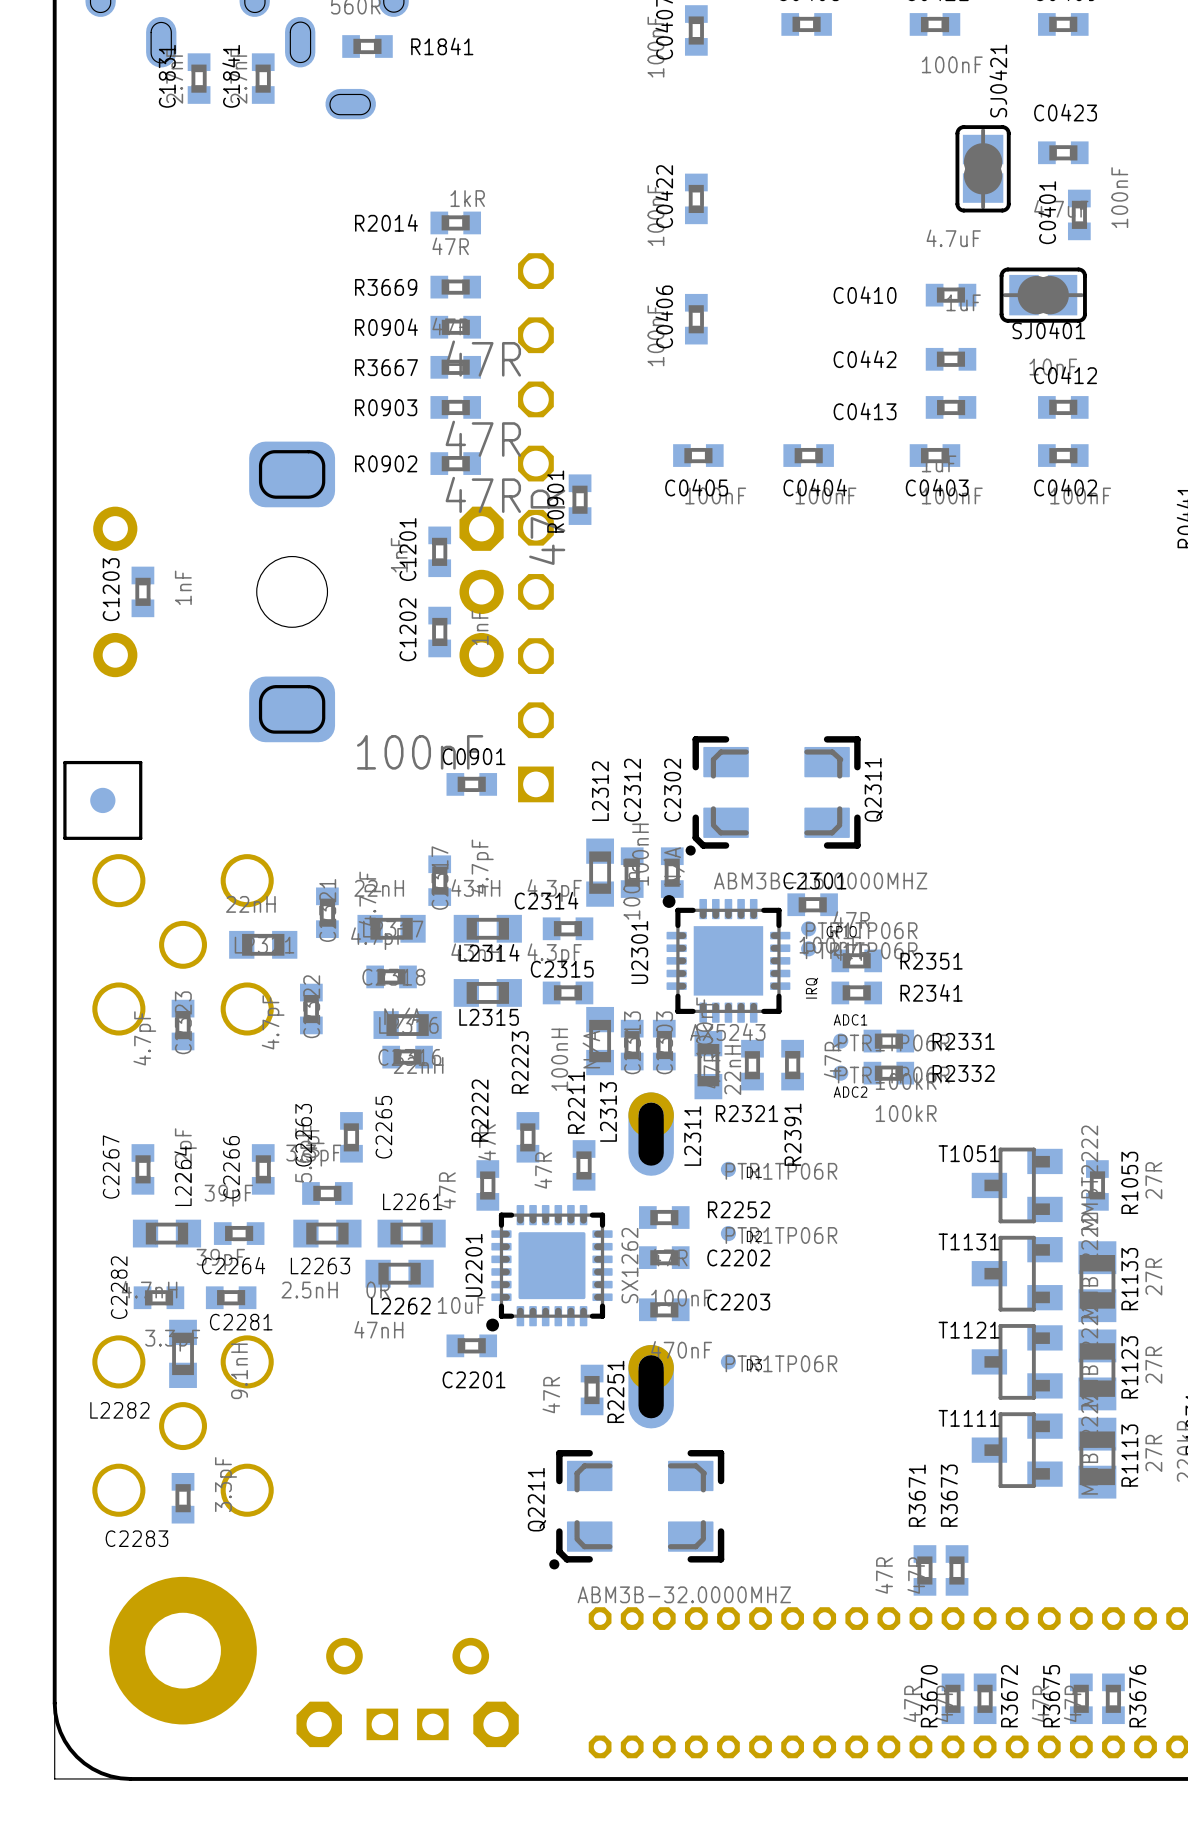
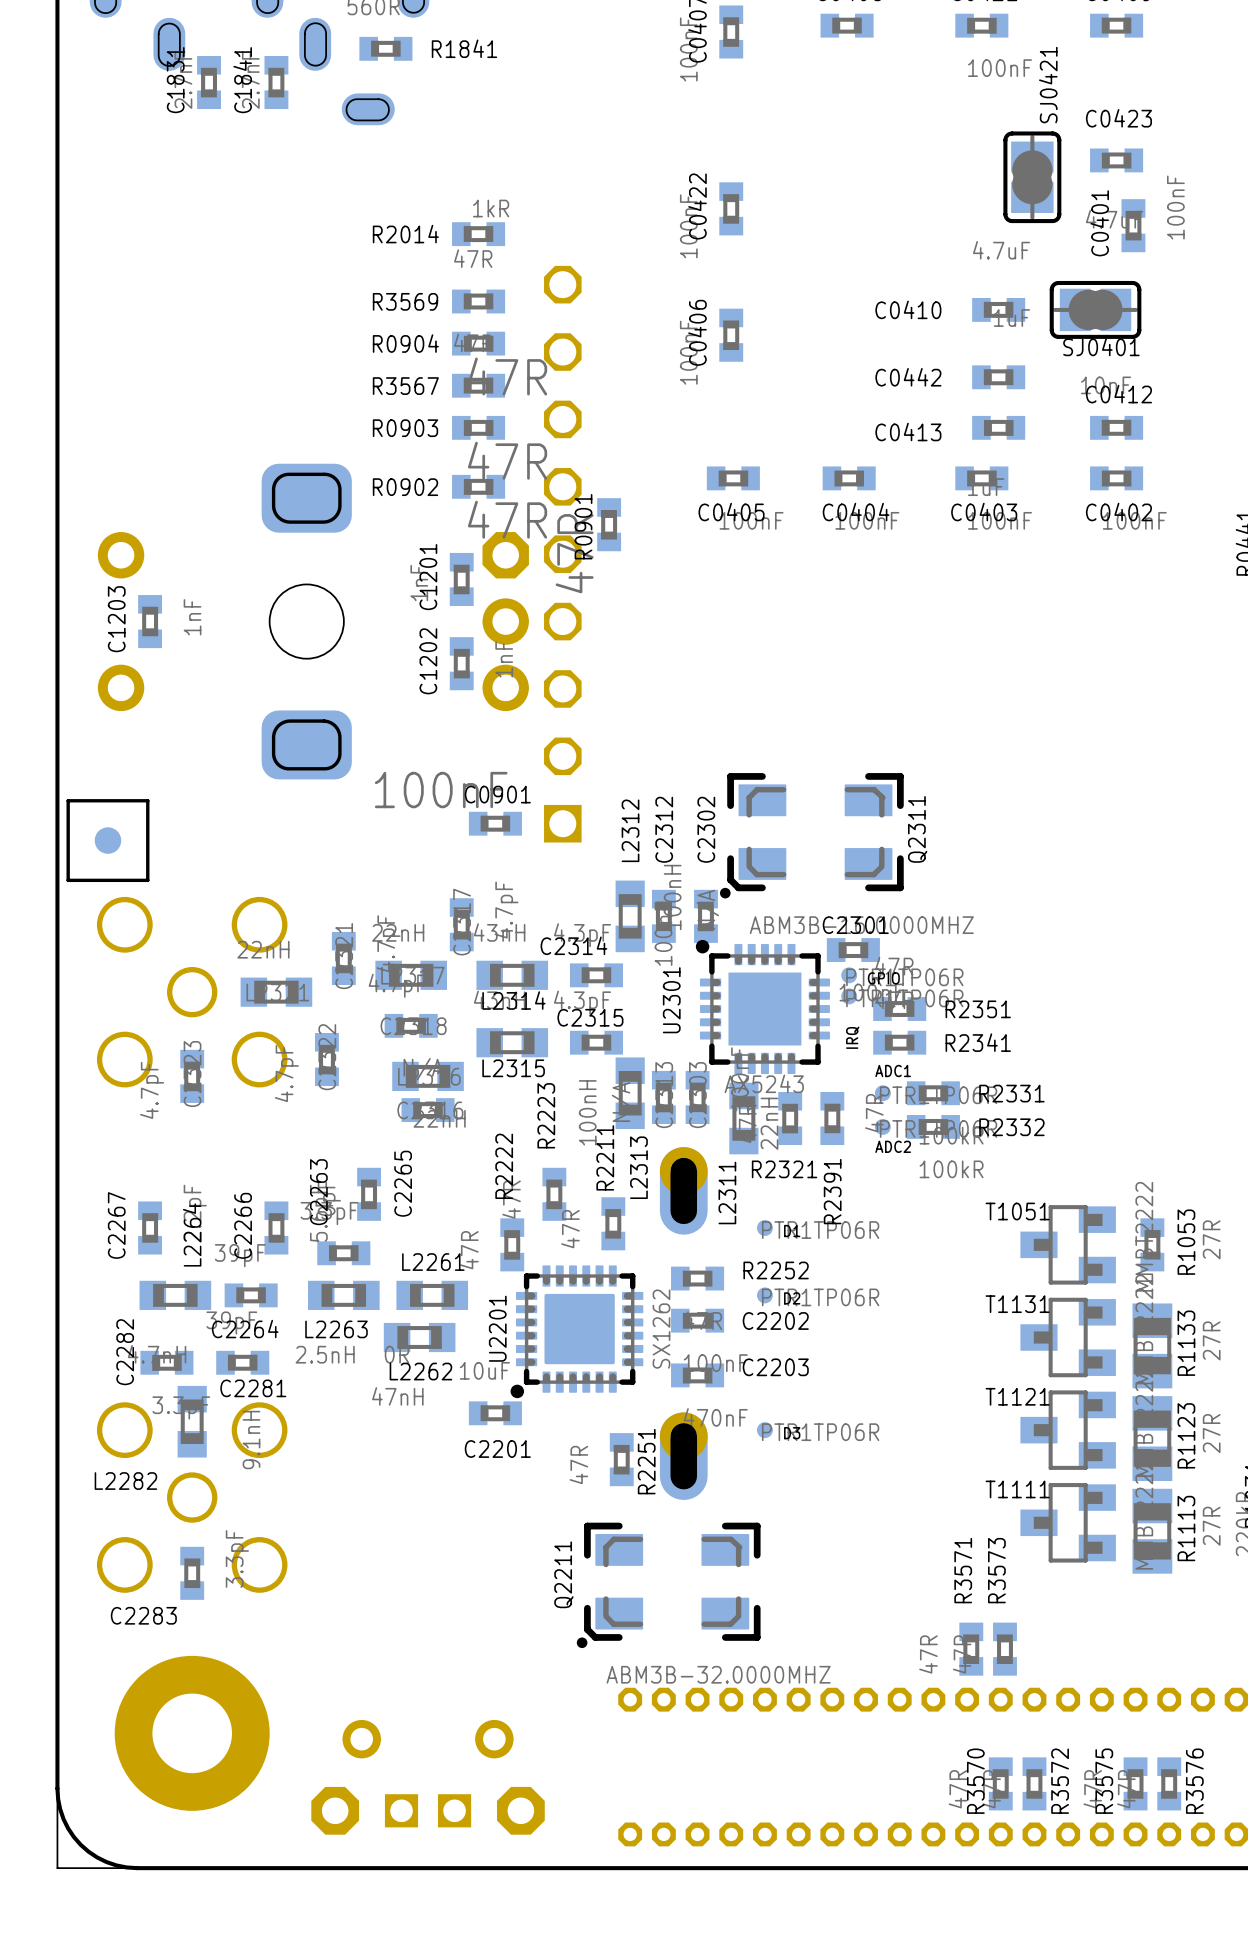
R3669 name: R3669 (386, 287) -> R3569 (405, 301)
R3667 name: R3667 (386, 367) -> R3567 (405, 386)
R3671 name: R3671 (917, 1495) -> R3571 (963, 1570)
R3673 name: R3673 (949, 1495) -> R3573 (996, 1570)
R3670 name: R3670 (929, 1696) -> R3570 (975, 1781)
R3672 name: R3672 (1009, 1696) -> R3572 (1060, 1781)
R3675 name: R3675 (1051, 1696) -> R3575 (1104, 1781)
R3676 name: R3676 (1137, 1696) -> R3576 (1194, 1781)

